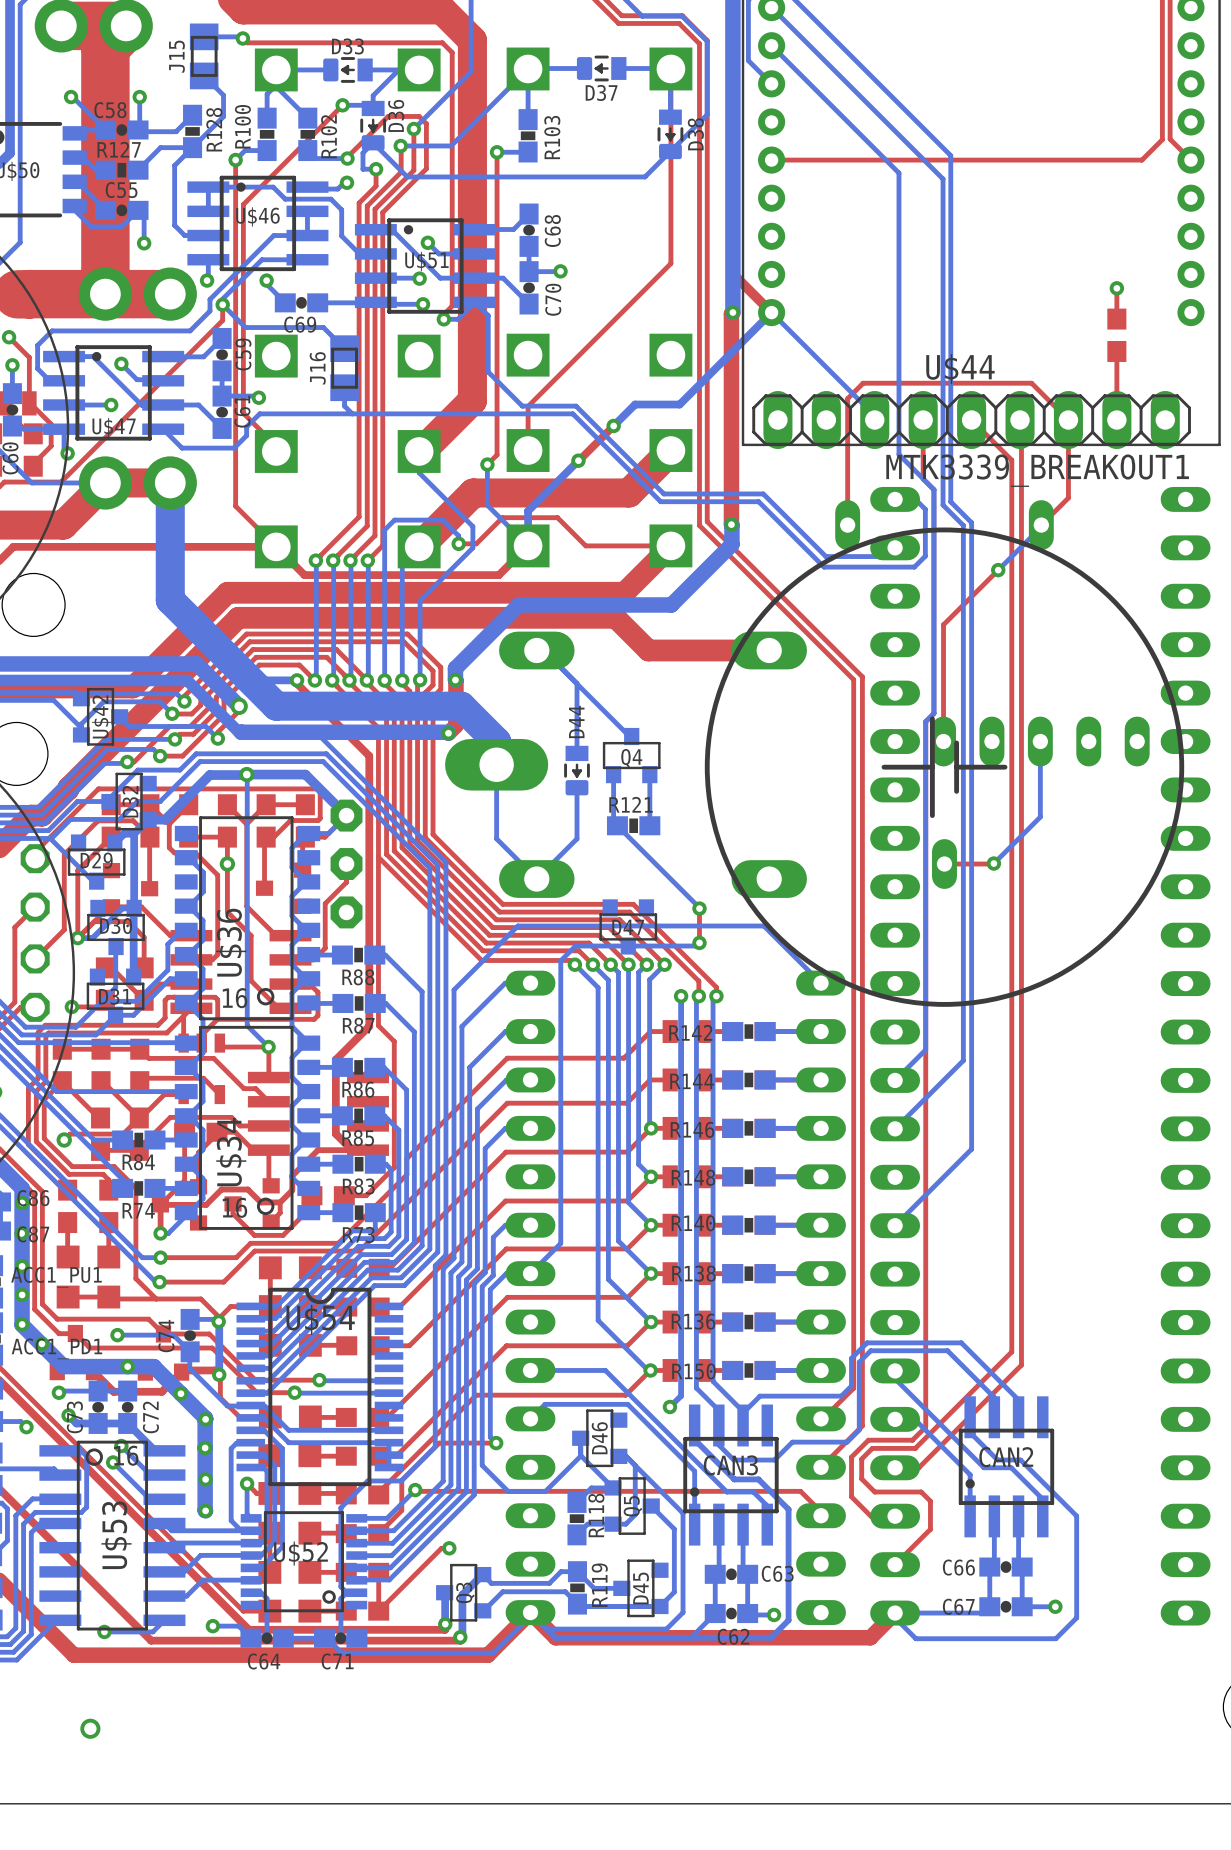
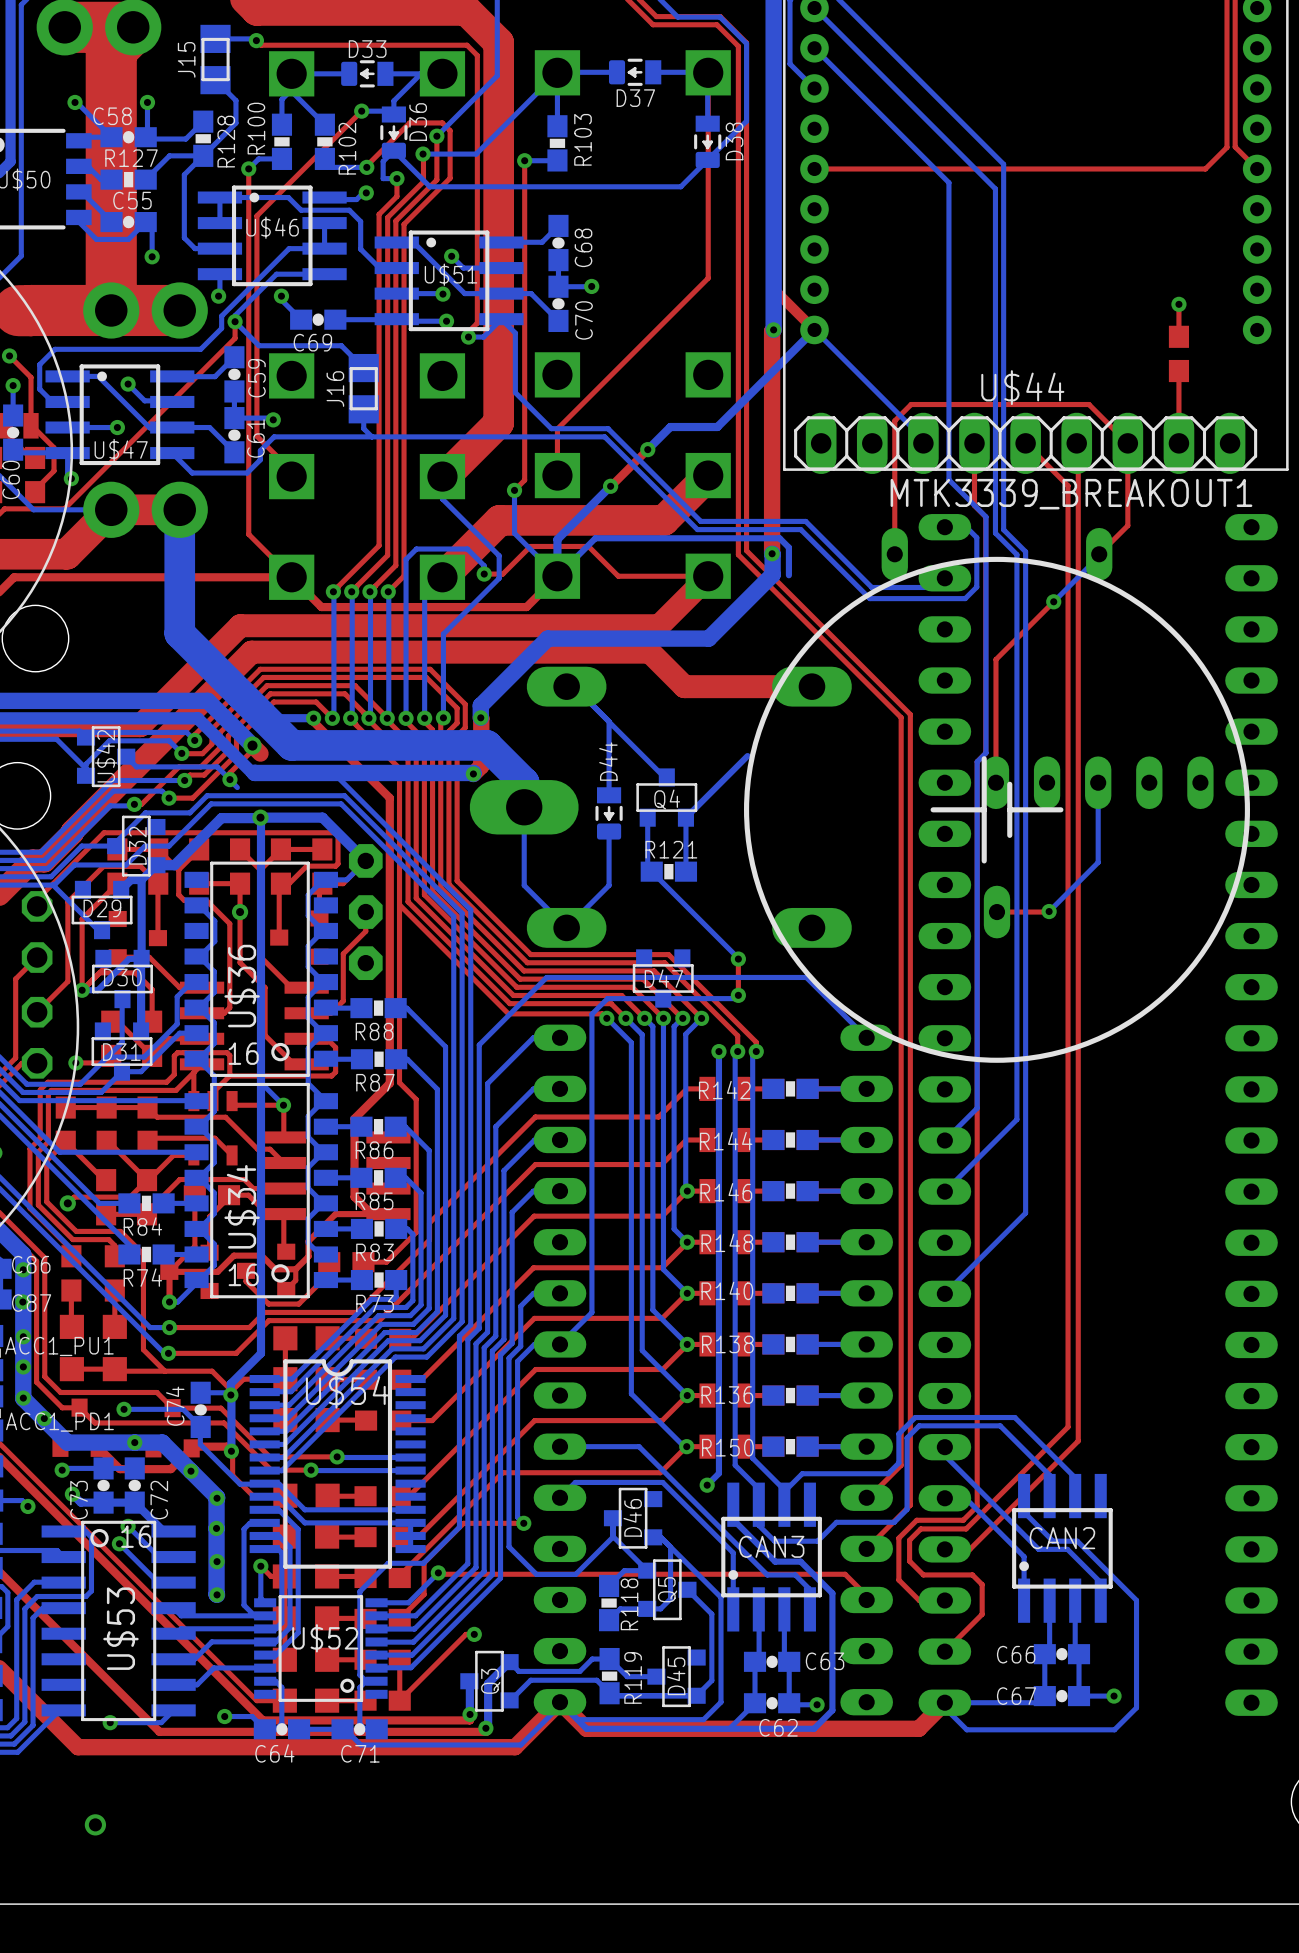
bottom track: none -> (788, 575) (788, 547) (779, 538) (595, 538) (557, 576)
top track: none -> (252, 745) (260, 753)
bottom track: none -> (747, 756) (685, 817)
bottom track: none -> (229, 779) (237, 787)
bottom track: none -> (260, 816) (260, 1353) (230, 1383) (230, 1395)

